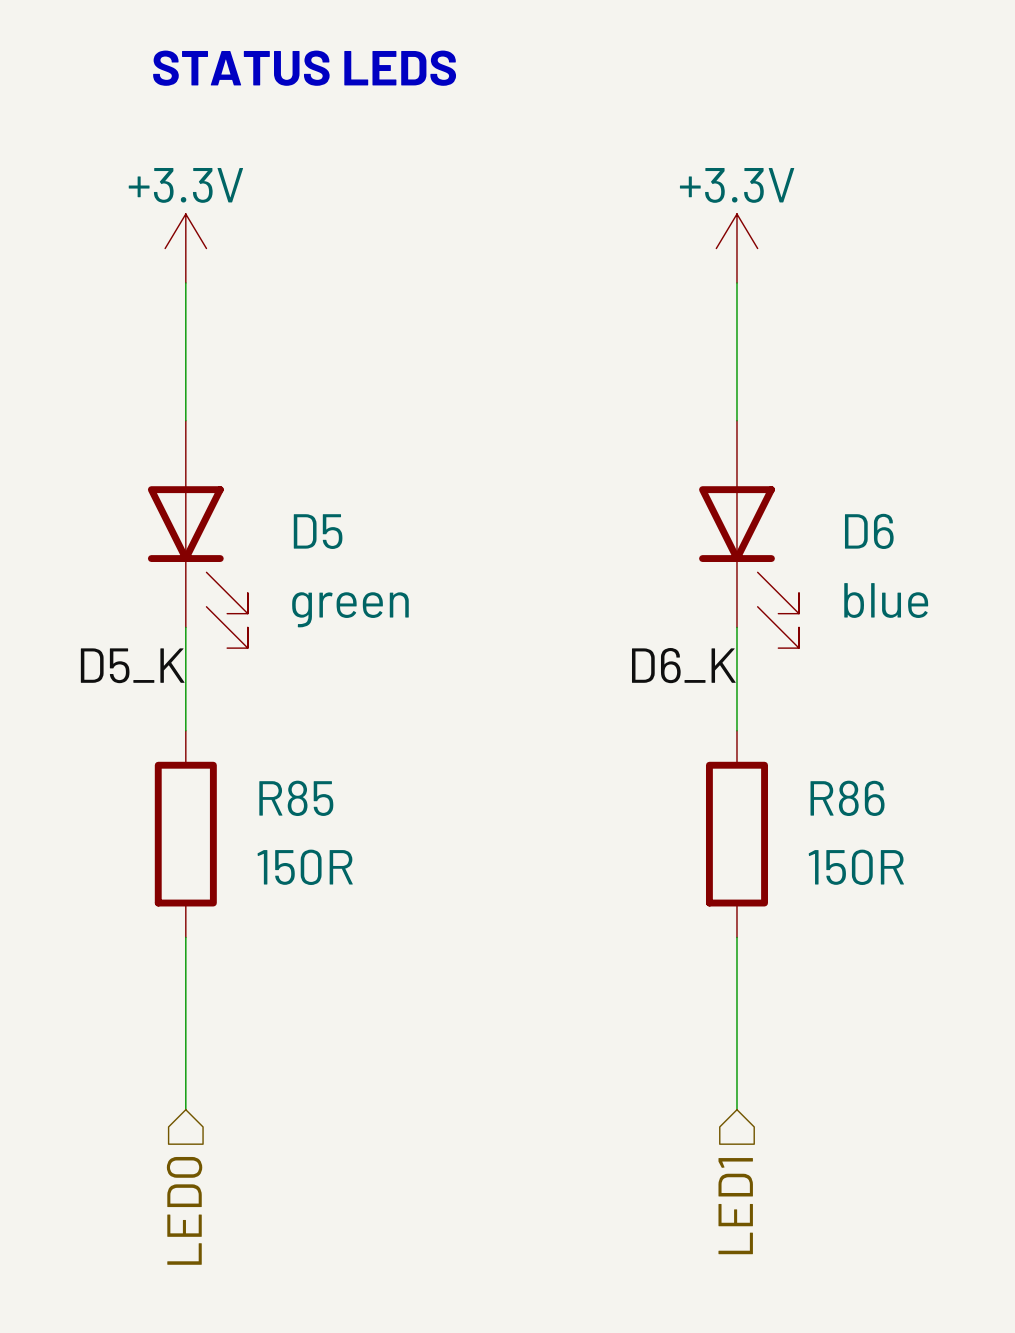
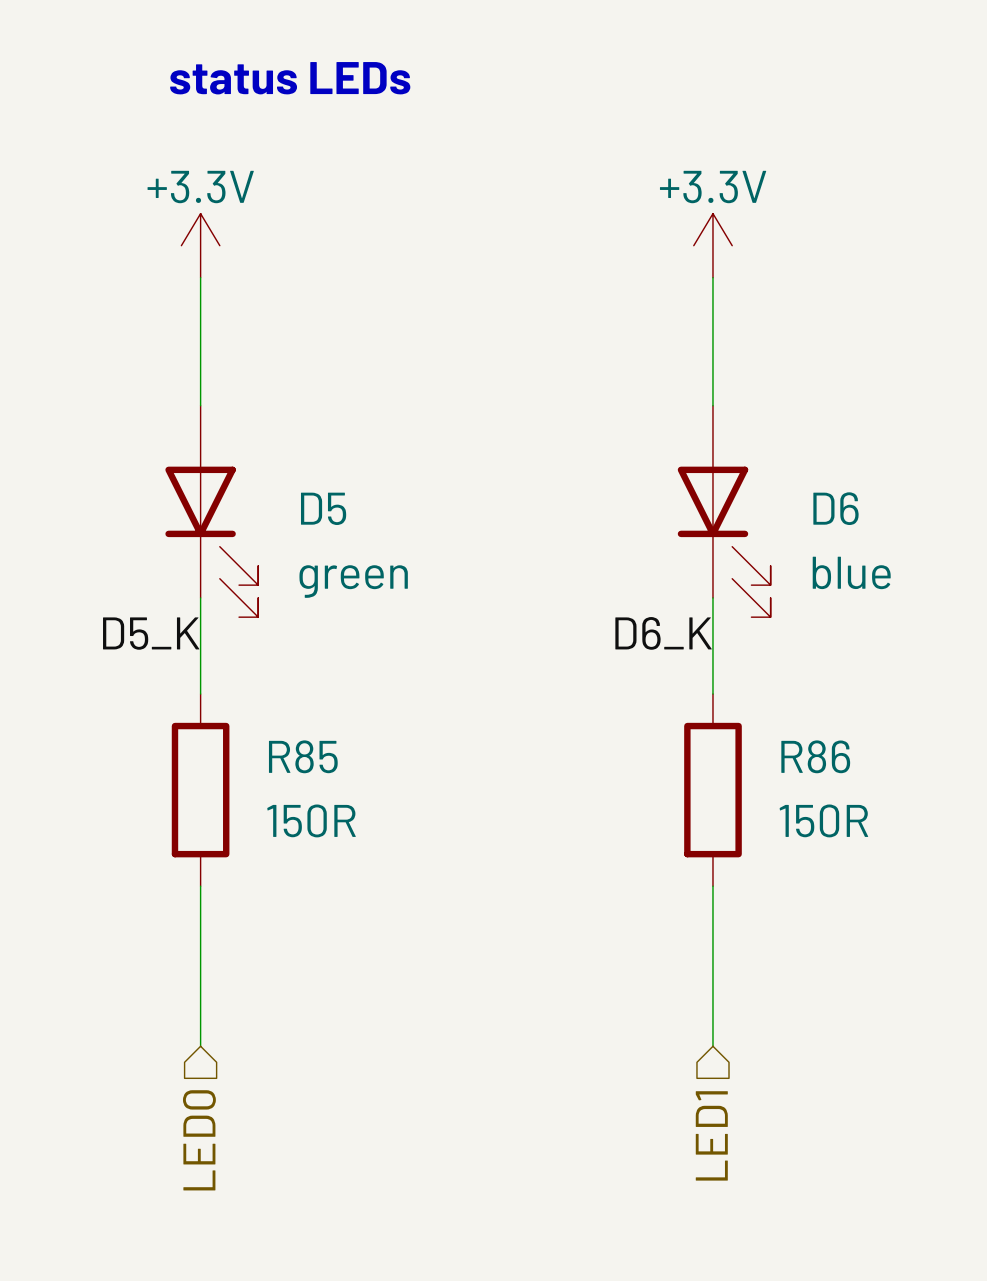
text: STATUS LEDS (304, 68) -> status LEDs (290, 78)

